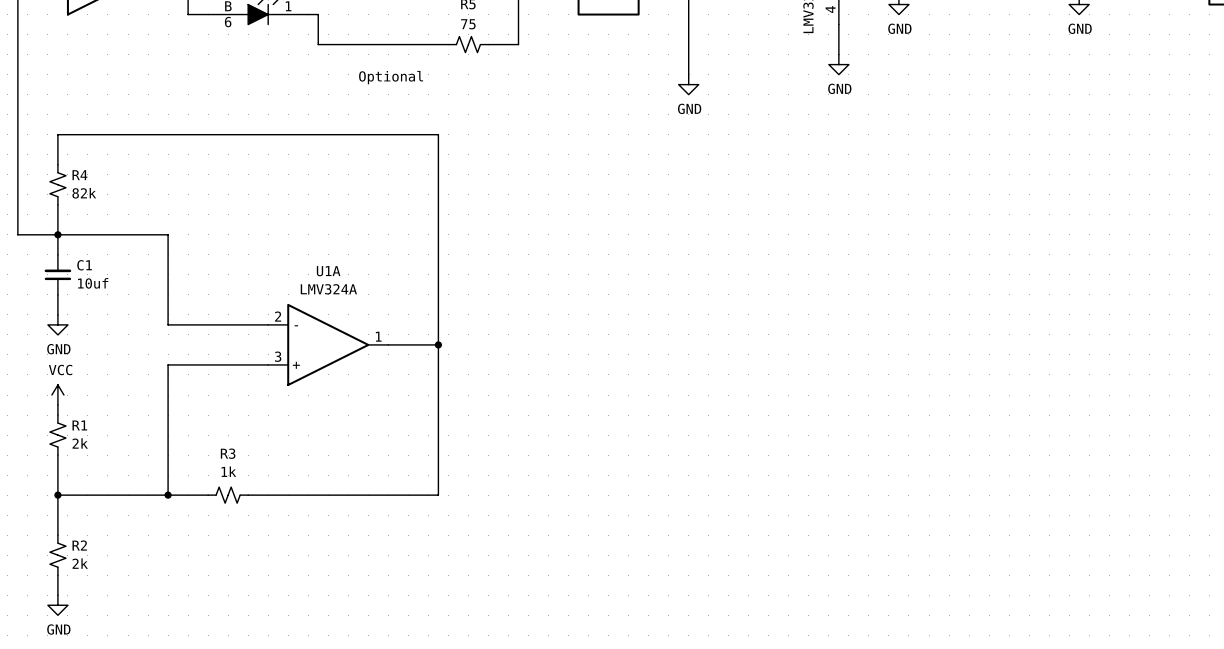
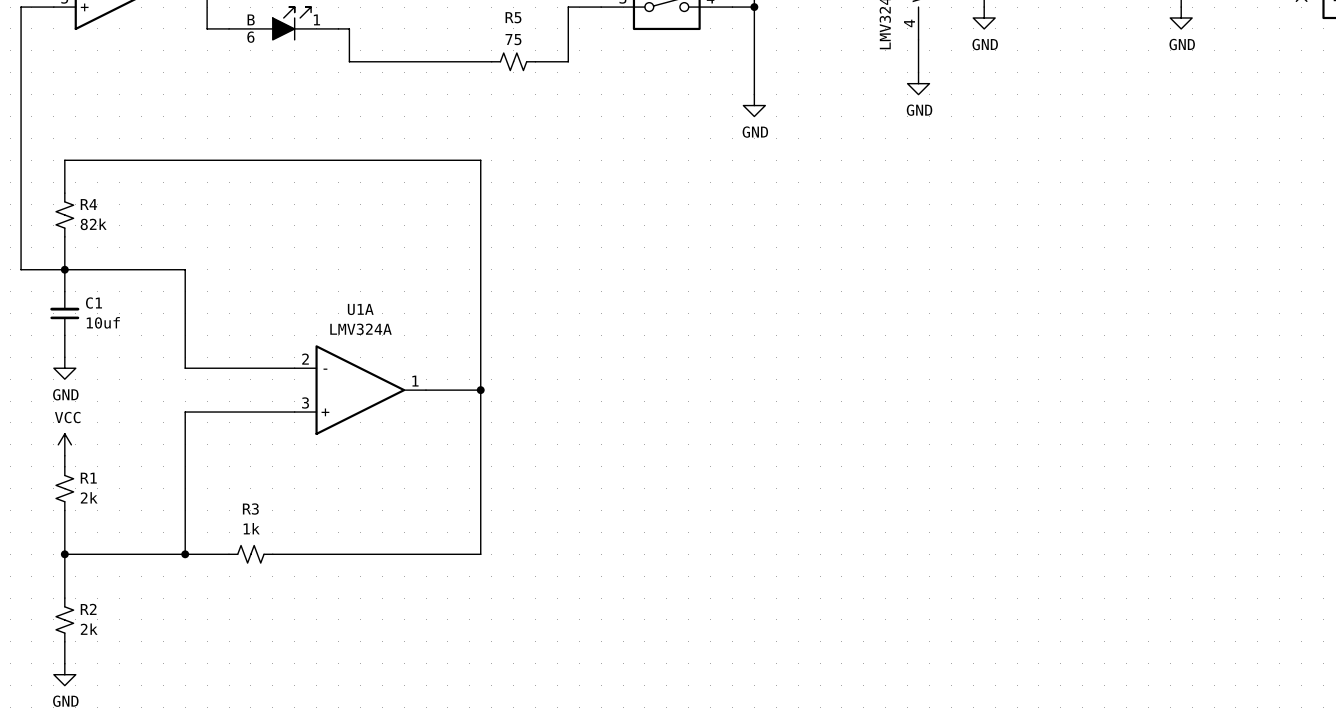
text: Optional (391, 77) -> none

